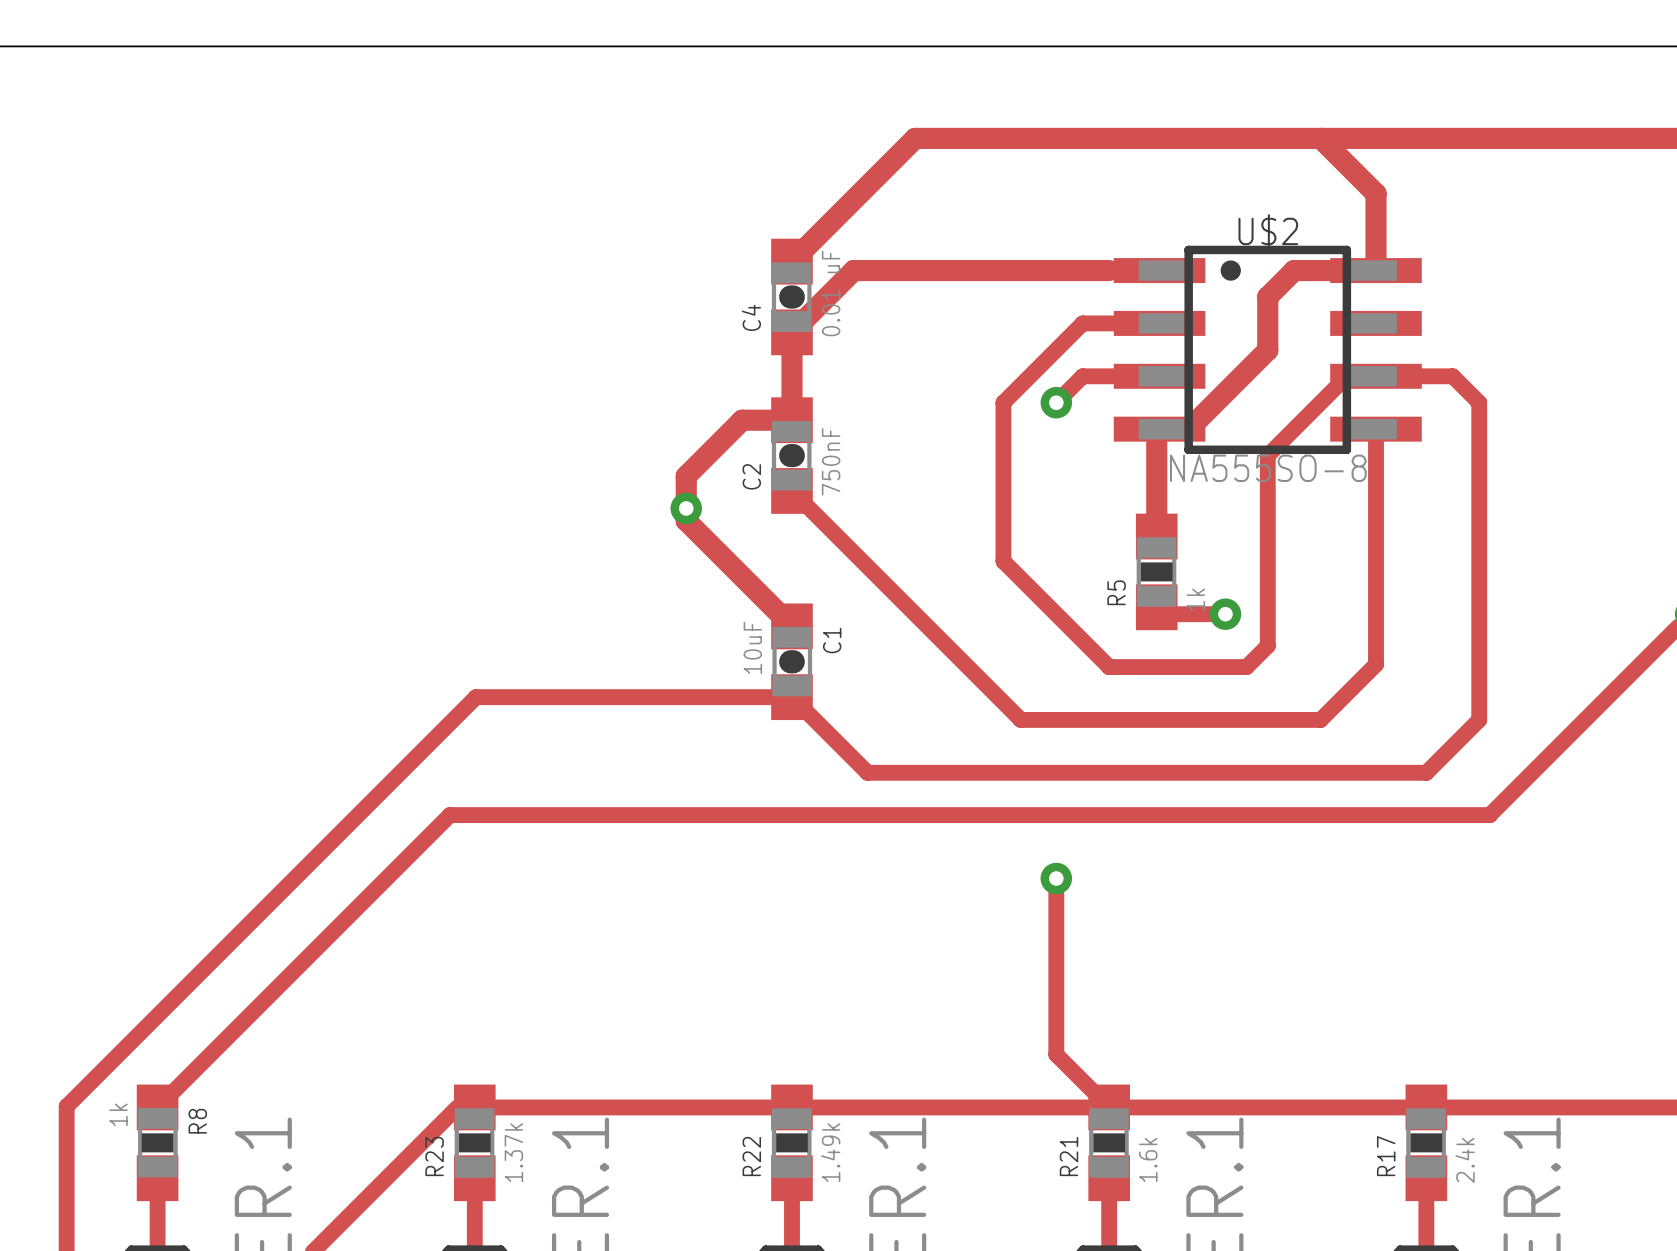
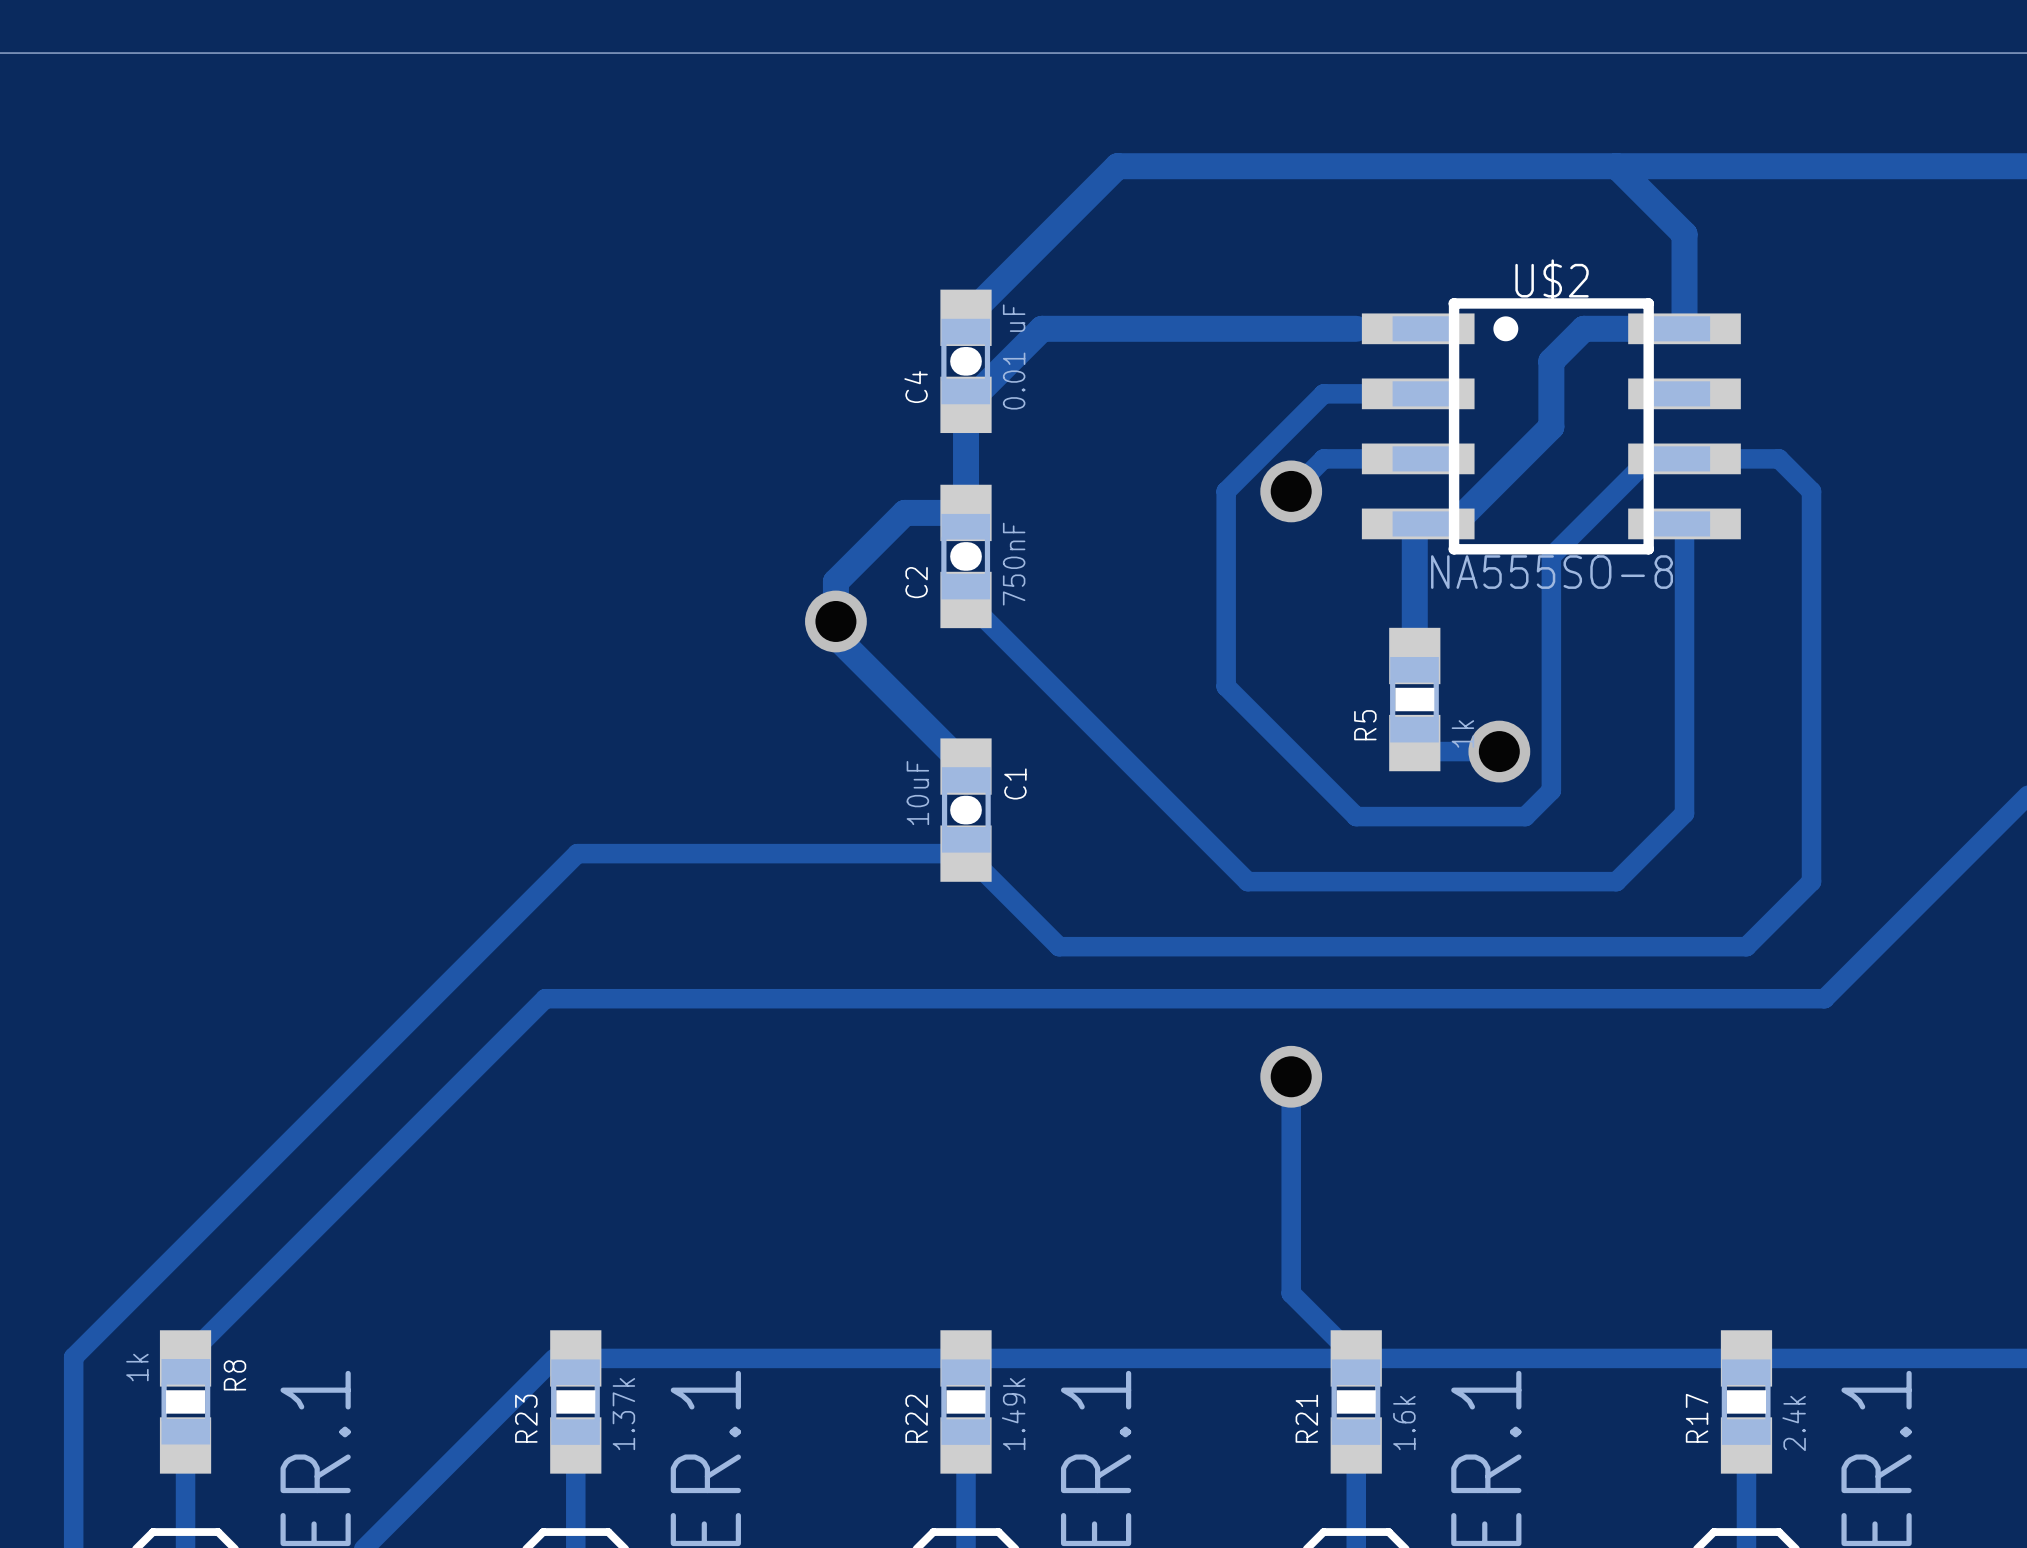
via size: [1040, 386, 1073, 419] -> [1260, 460, 1323, 523]
via size: [670, 492, 702, 525] -> [805, 590, 867, 653]
via size: [1209, 598, 1242, 630] -> [1468, 720, 1531, 783]
via size: [1040, 862, 1073, 895] -> [1260, 1045, 1323, 1108]

